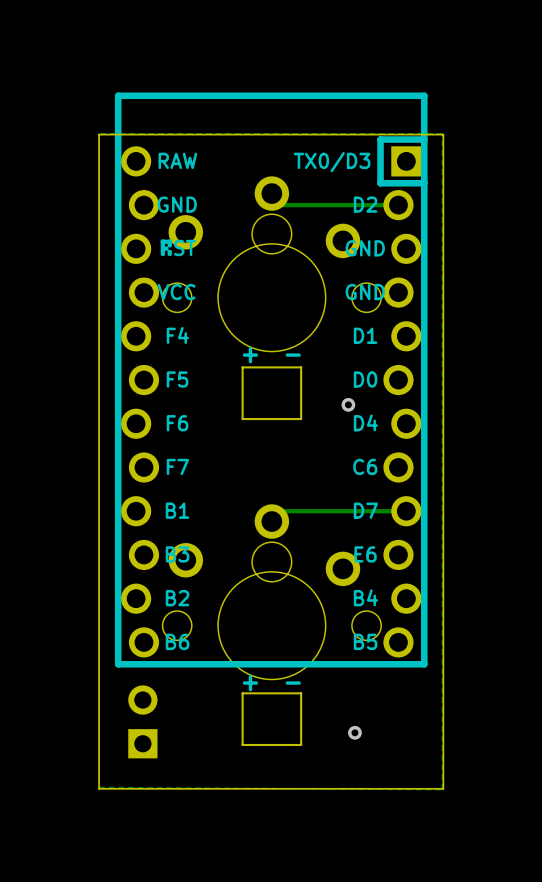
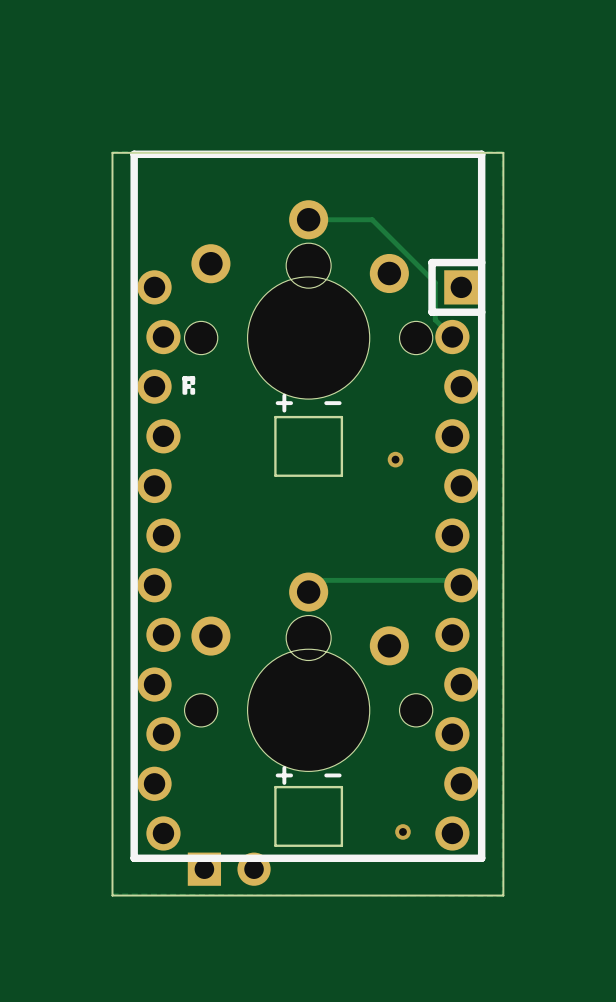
track: (271, 193) (283, 205) (398, 205) -> (308, 219) (372, 219) (435, 282) (435, 319) (452, 337)
part: (271, 380) -> none
part: none -> (307, 506)
part rotation: 0° (142, 721) -> 90° clockwise (229, 869)
part position: (142, 721) -> (229, 869)

